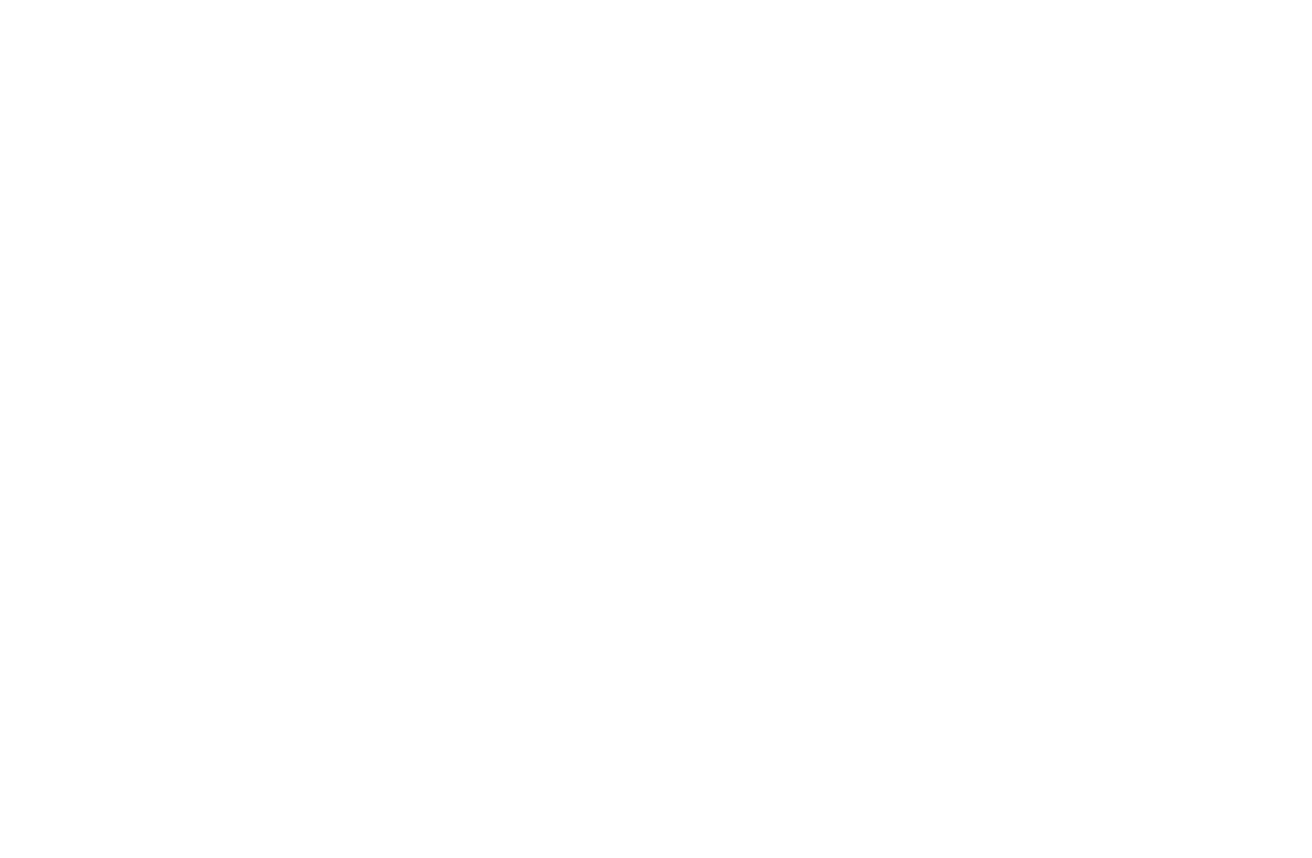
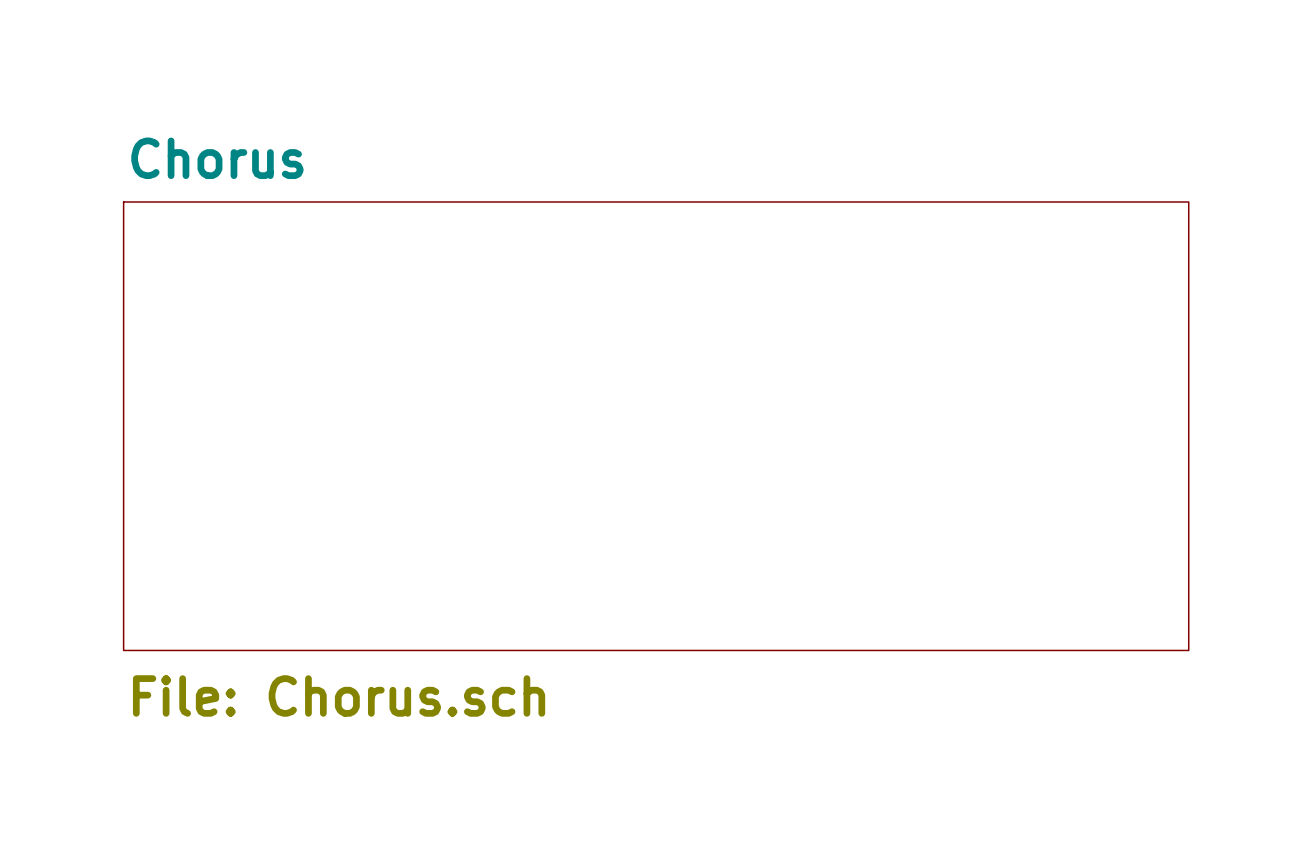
sheet Chorus: none -> File: Chorus.sch (656, 426)

